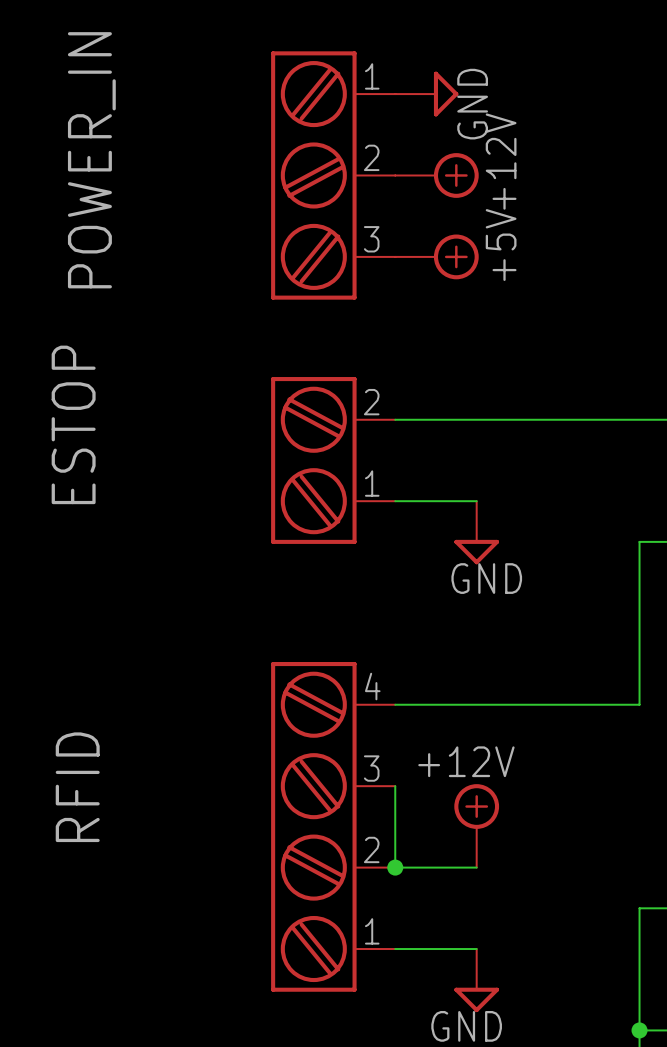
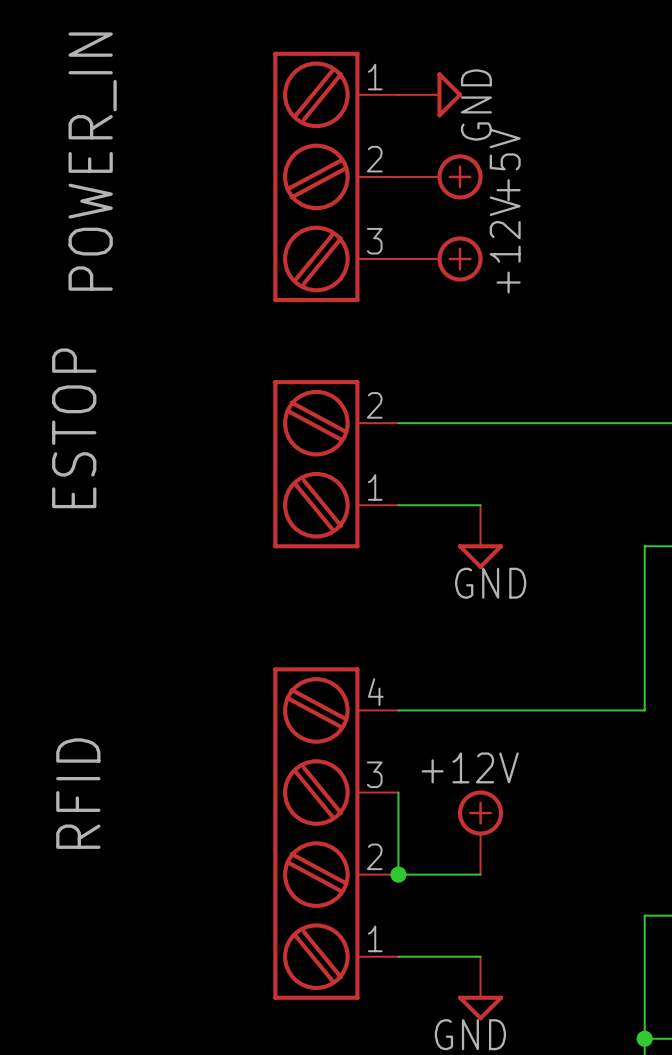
power symbol: +12V (436, 175) -> +5V (440, 176)
power symbol: +5V (436, 256) -> +12V (440, 258)

